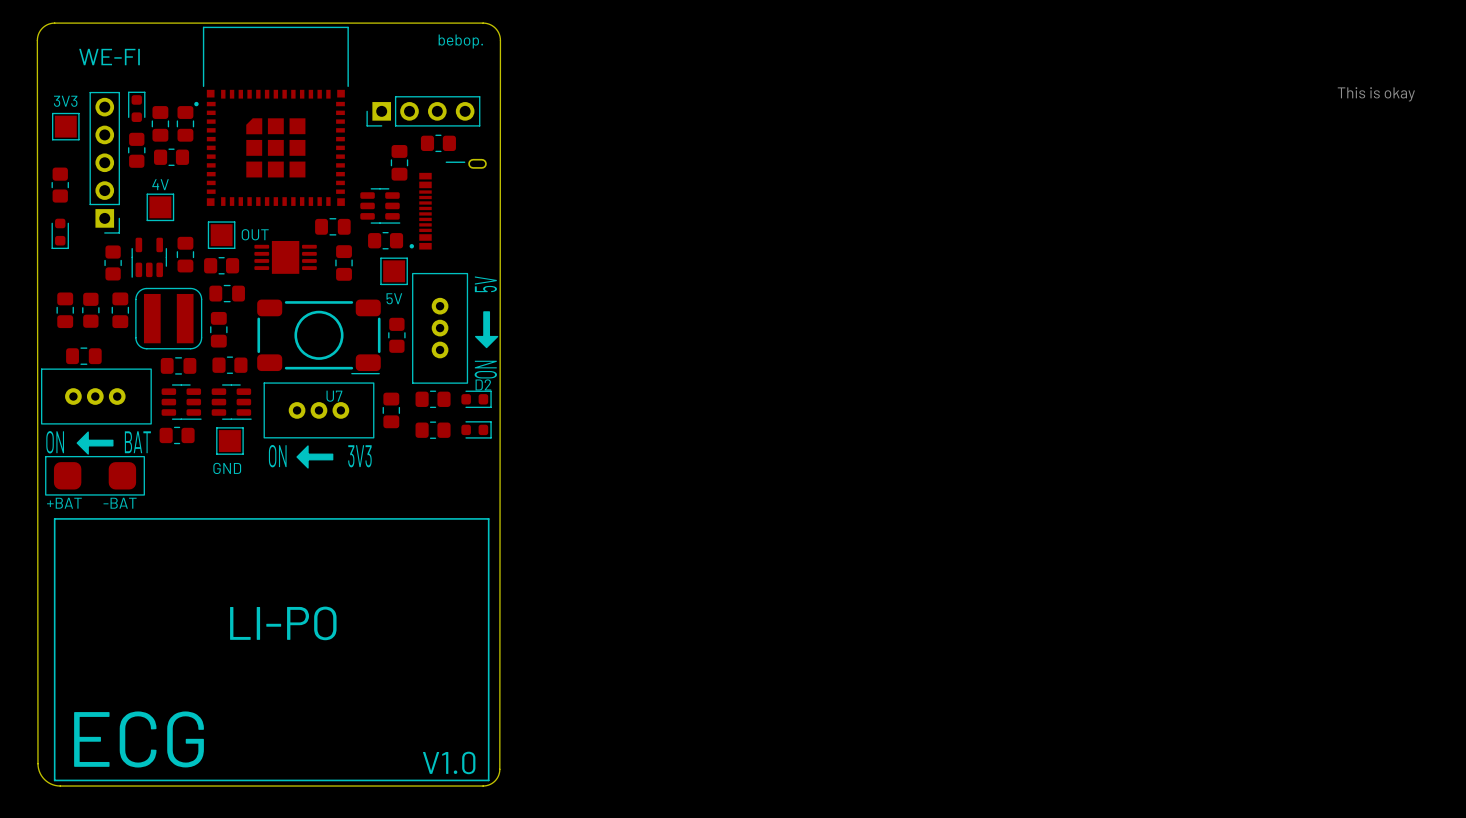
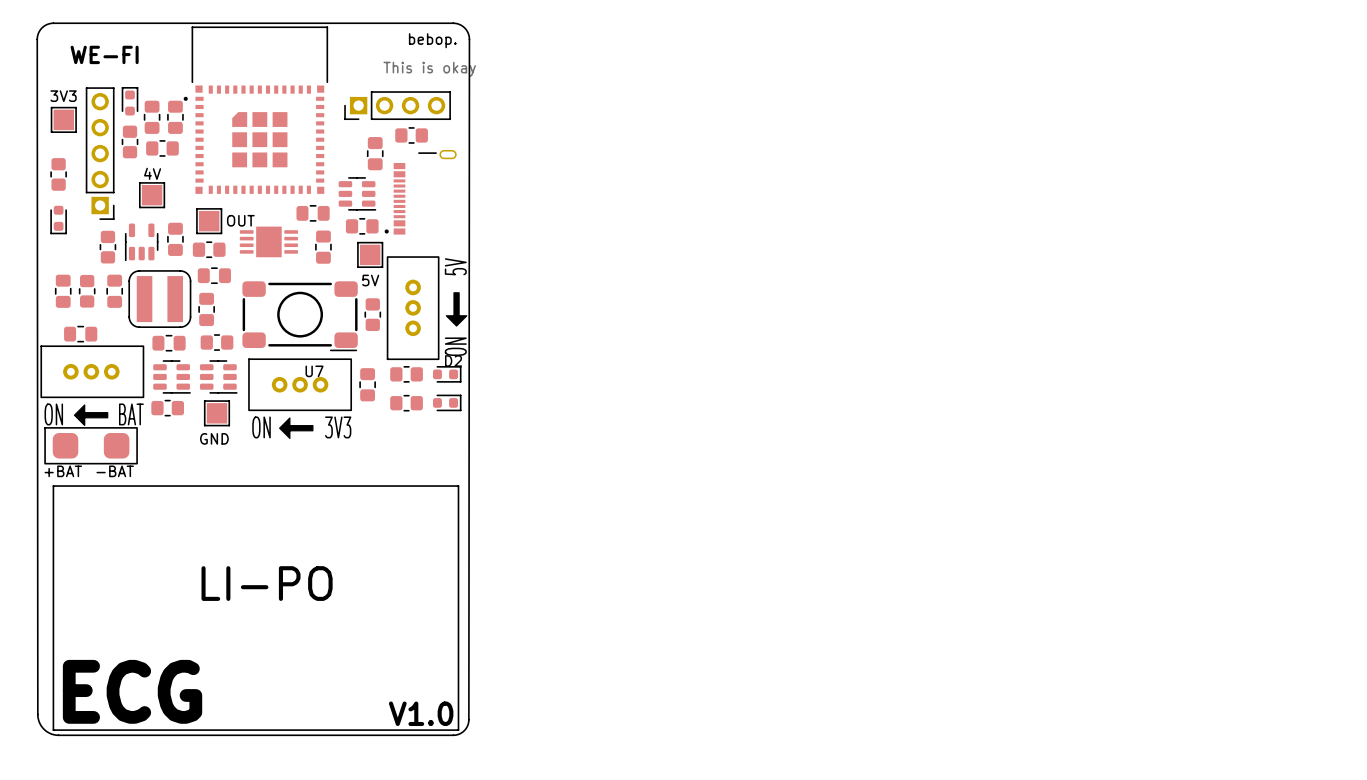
text: none -> This is okay (429, 69)
text: This is okay (1376, 94) -> none

